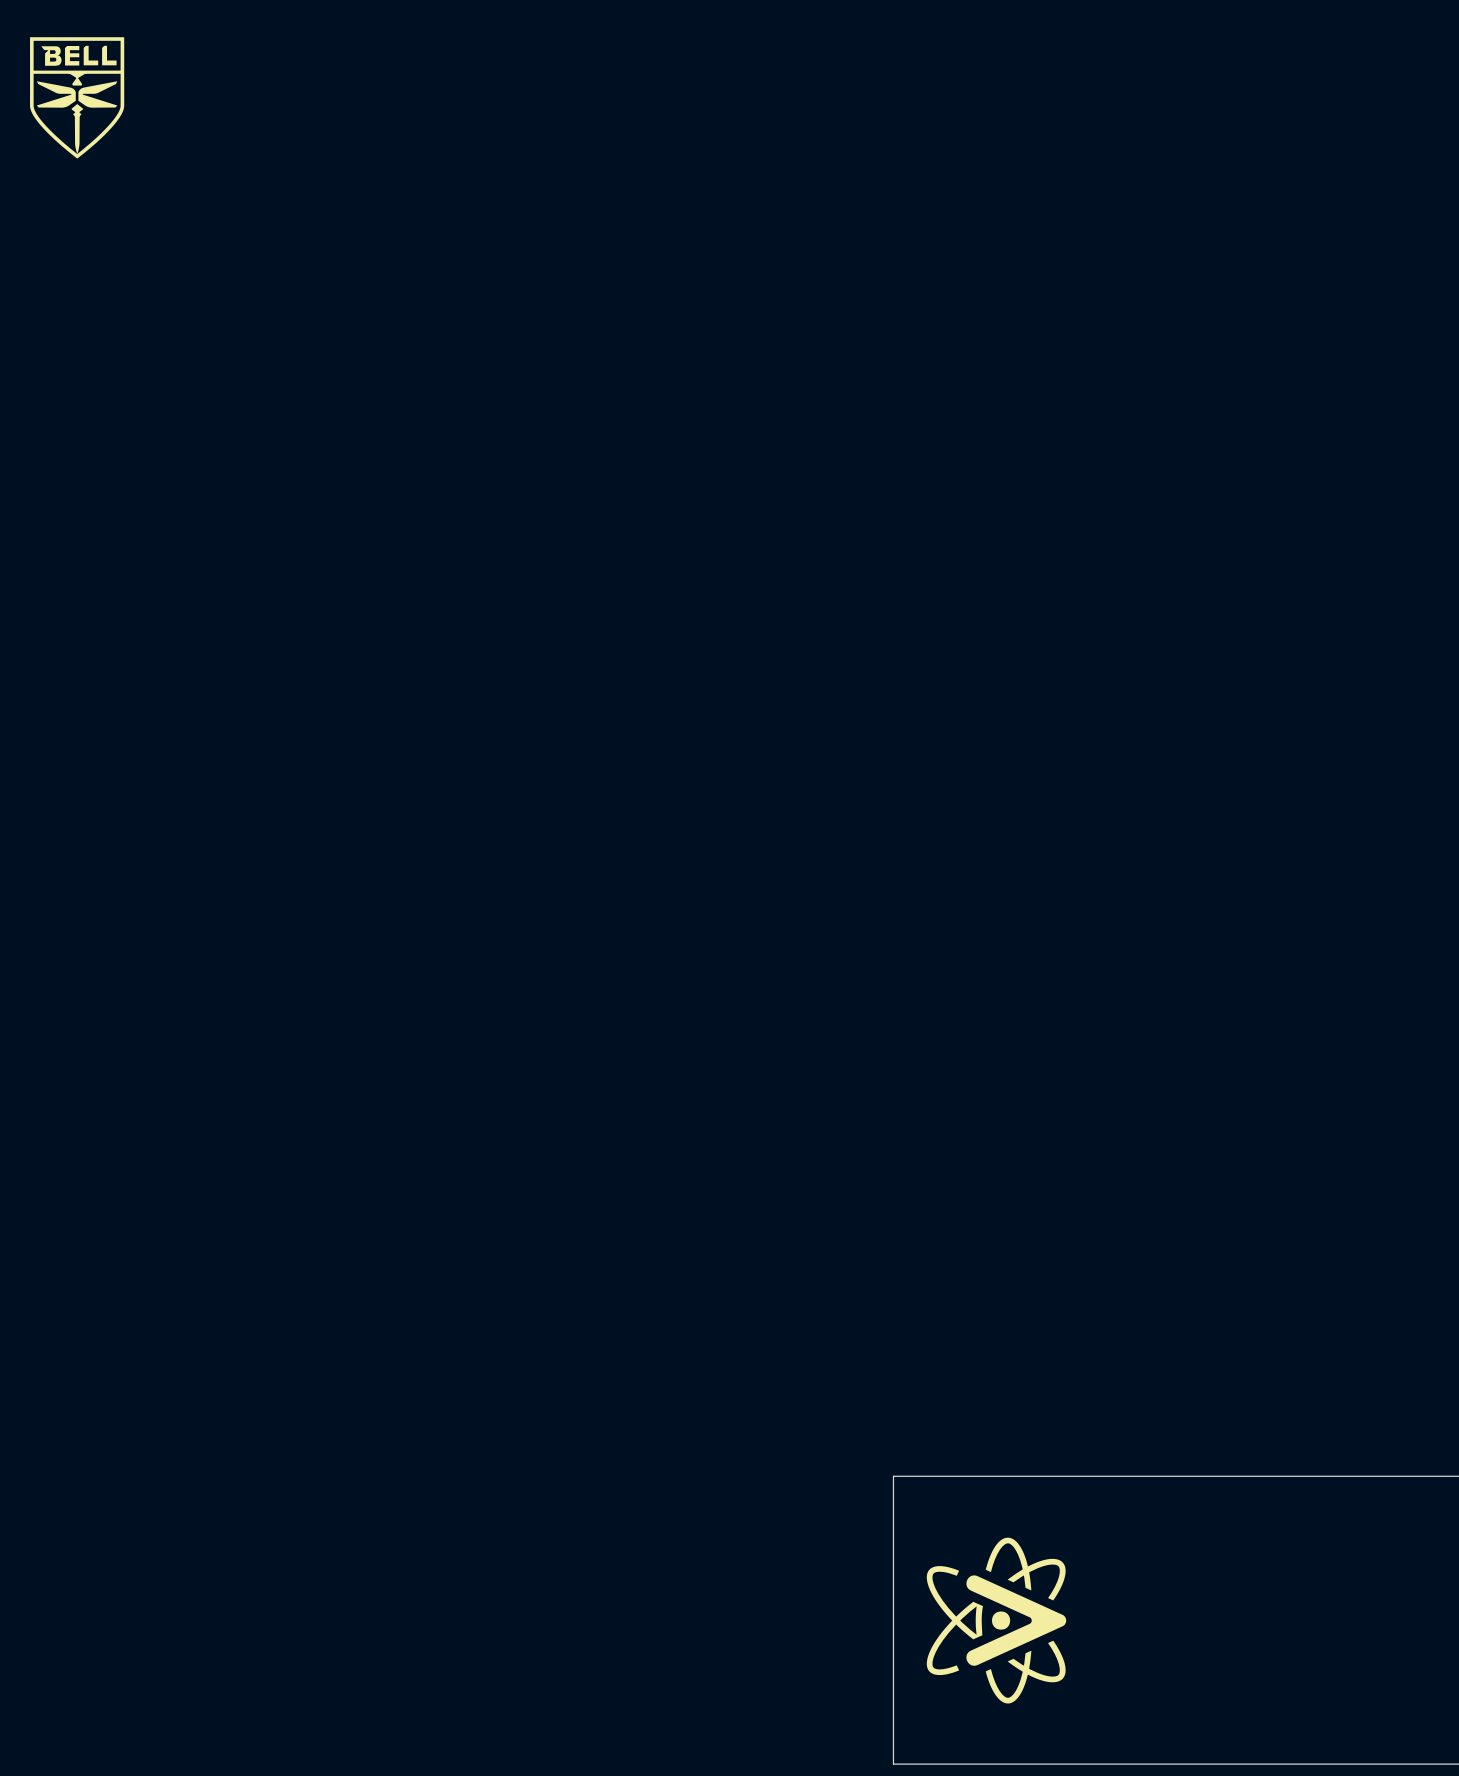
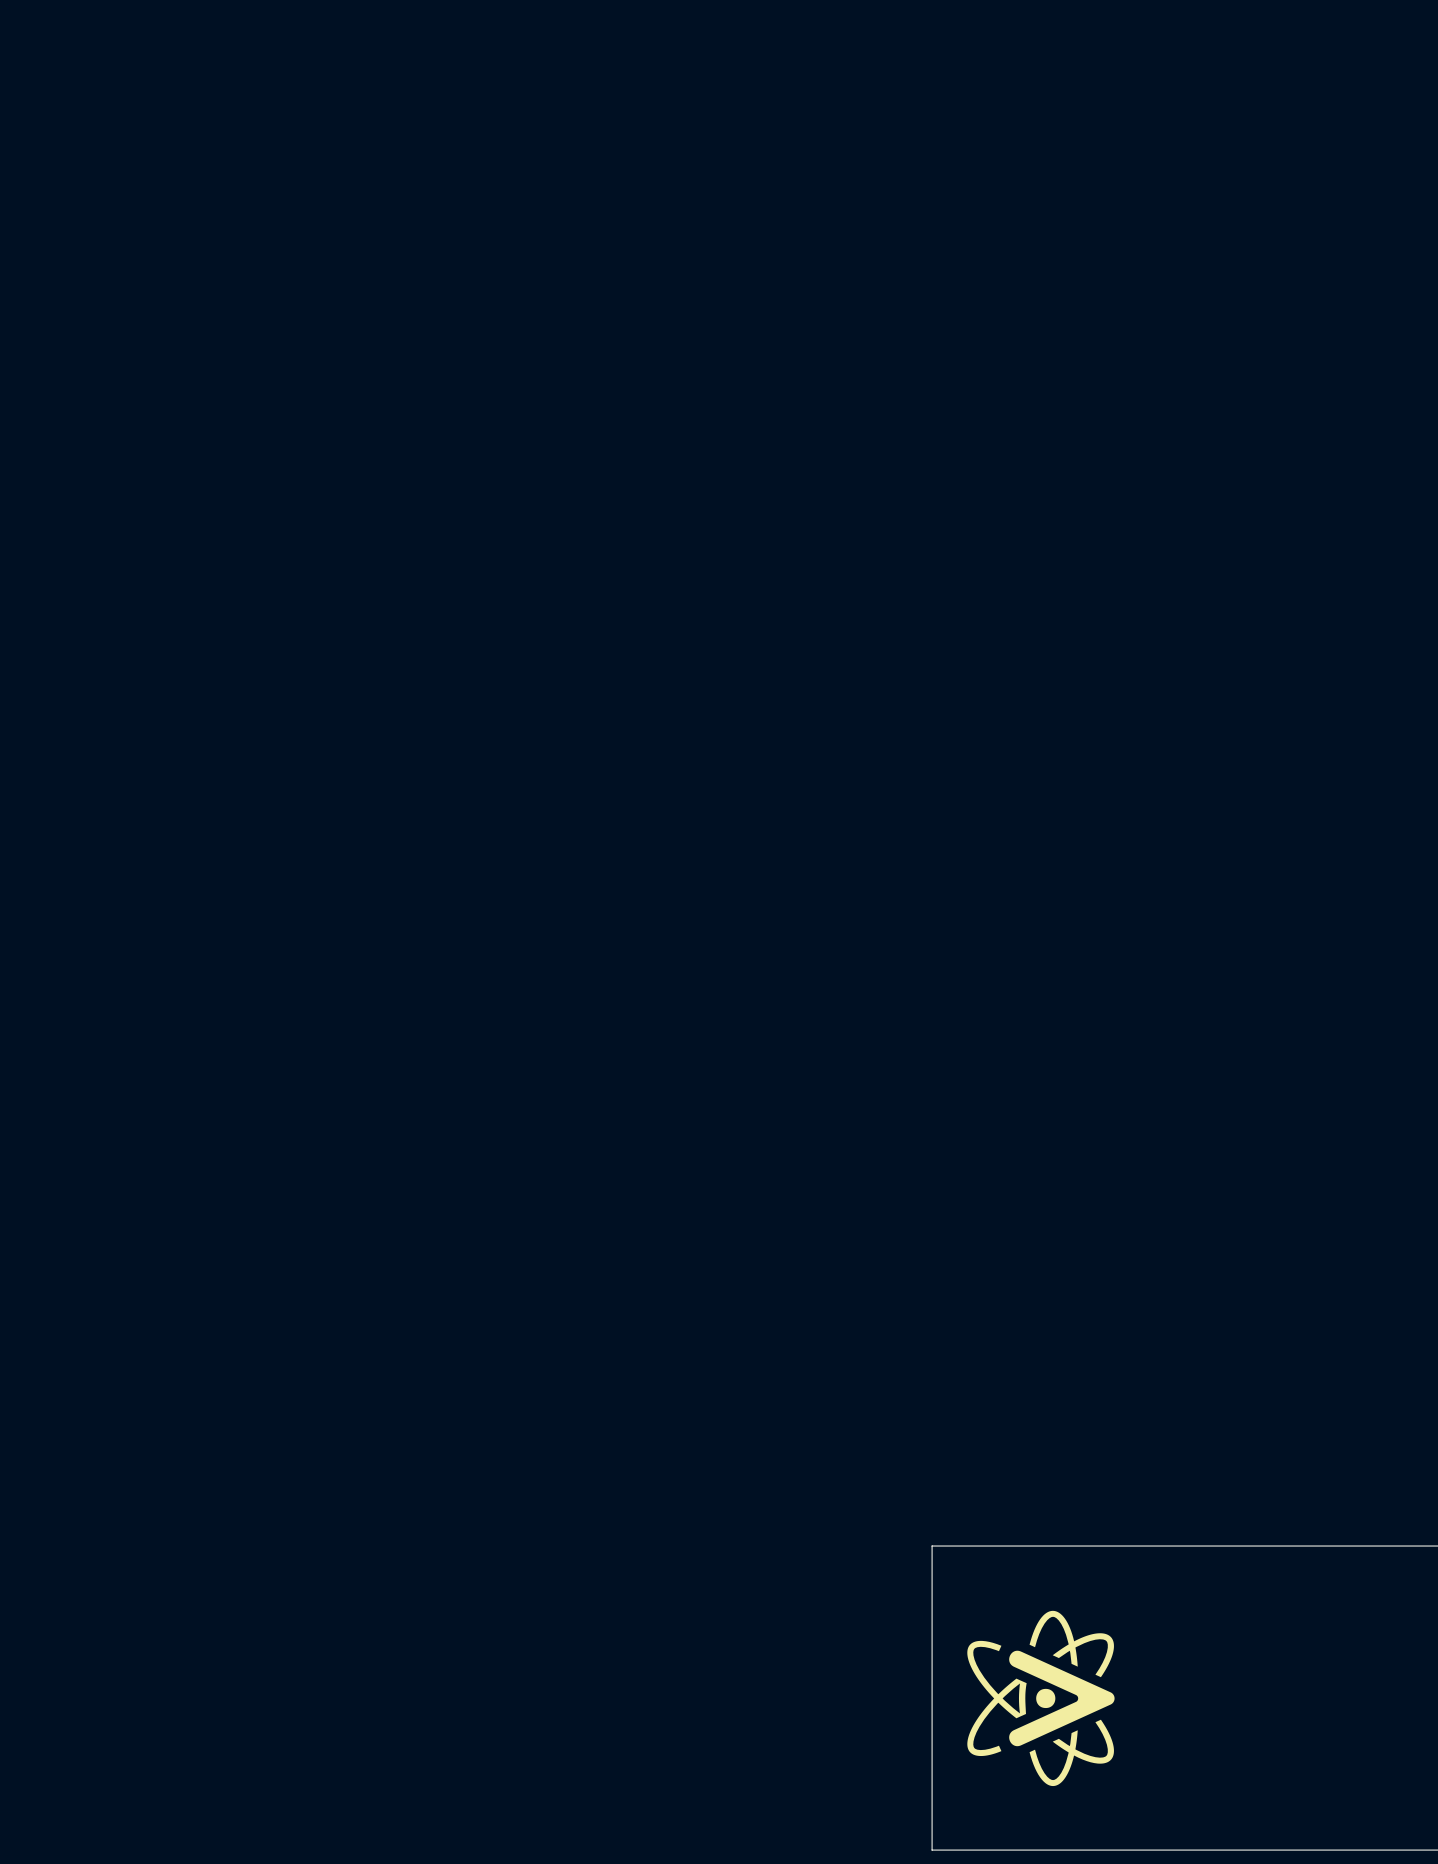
drawing: [30, 37, 125, 159] -> none

